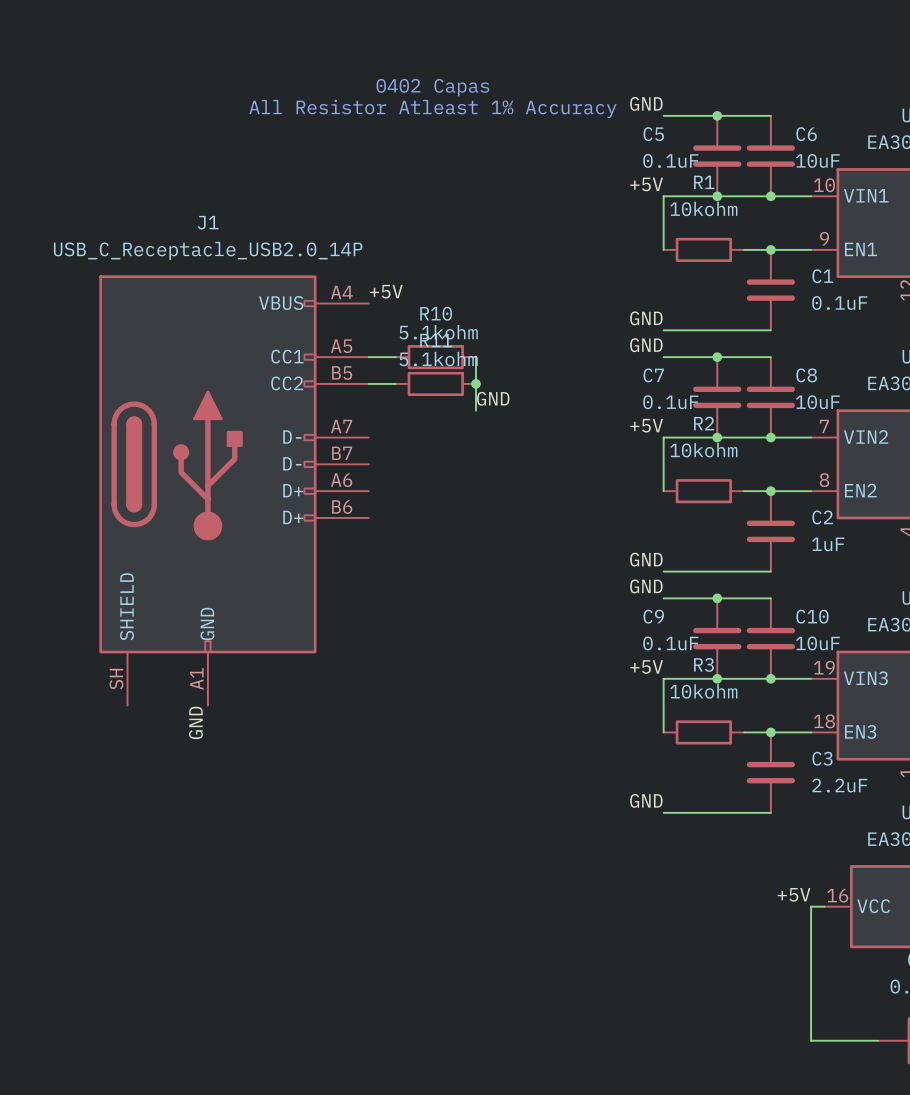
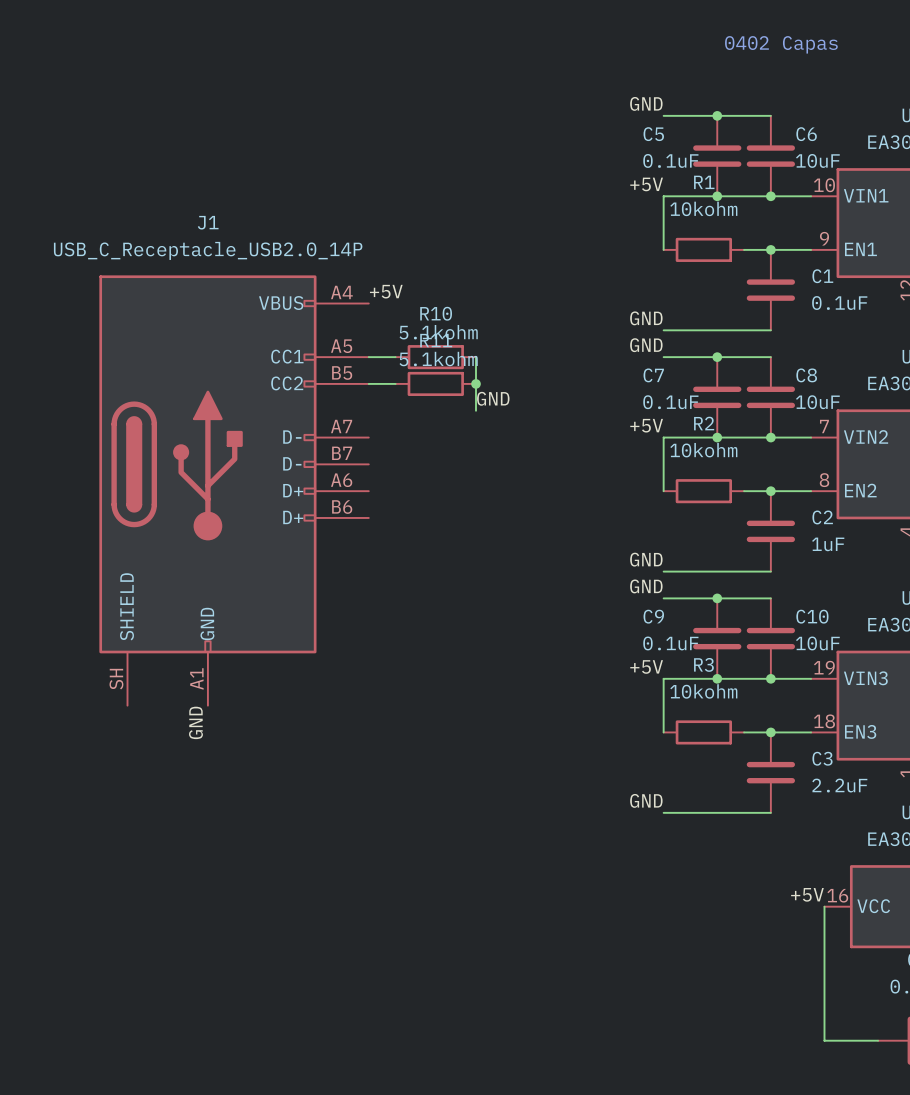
text: none -> 0402 Capas (781, 44)
text: 0402 Capas (432, 87) -> none
text: All Resistor Atleast 1% Accuracy (432, 108) -> none
label position: +5V (794, 894) -> +5V (807, 894)
wire: (824, 906) (811, 906) (811, 1040) (824, 1040) -> (824, 906) (824, 1040)

